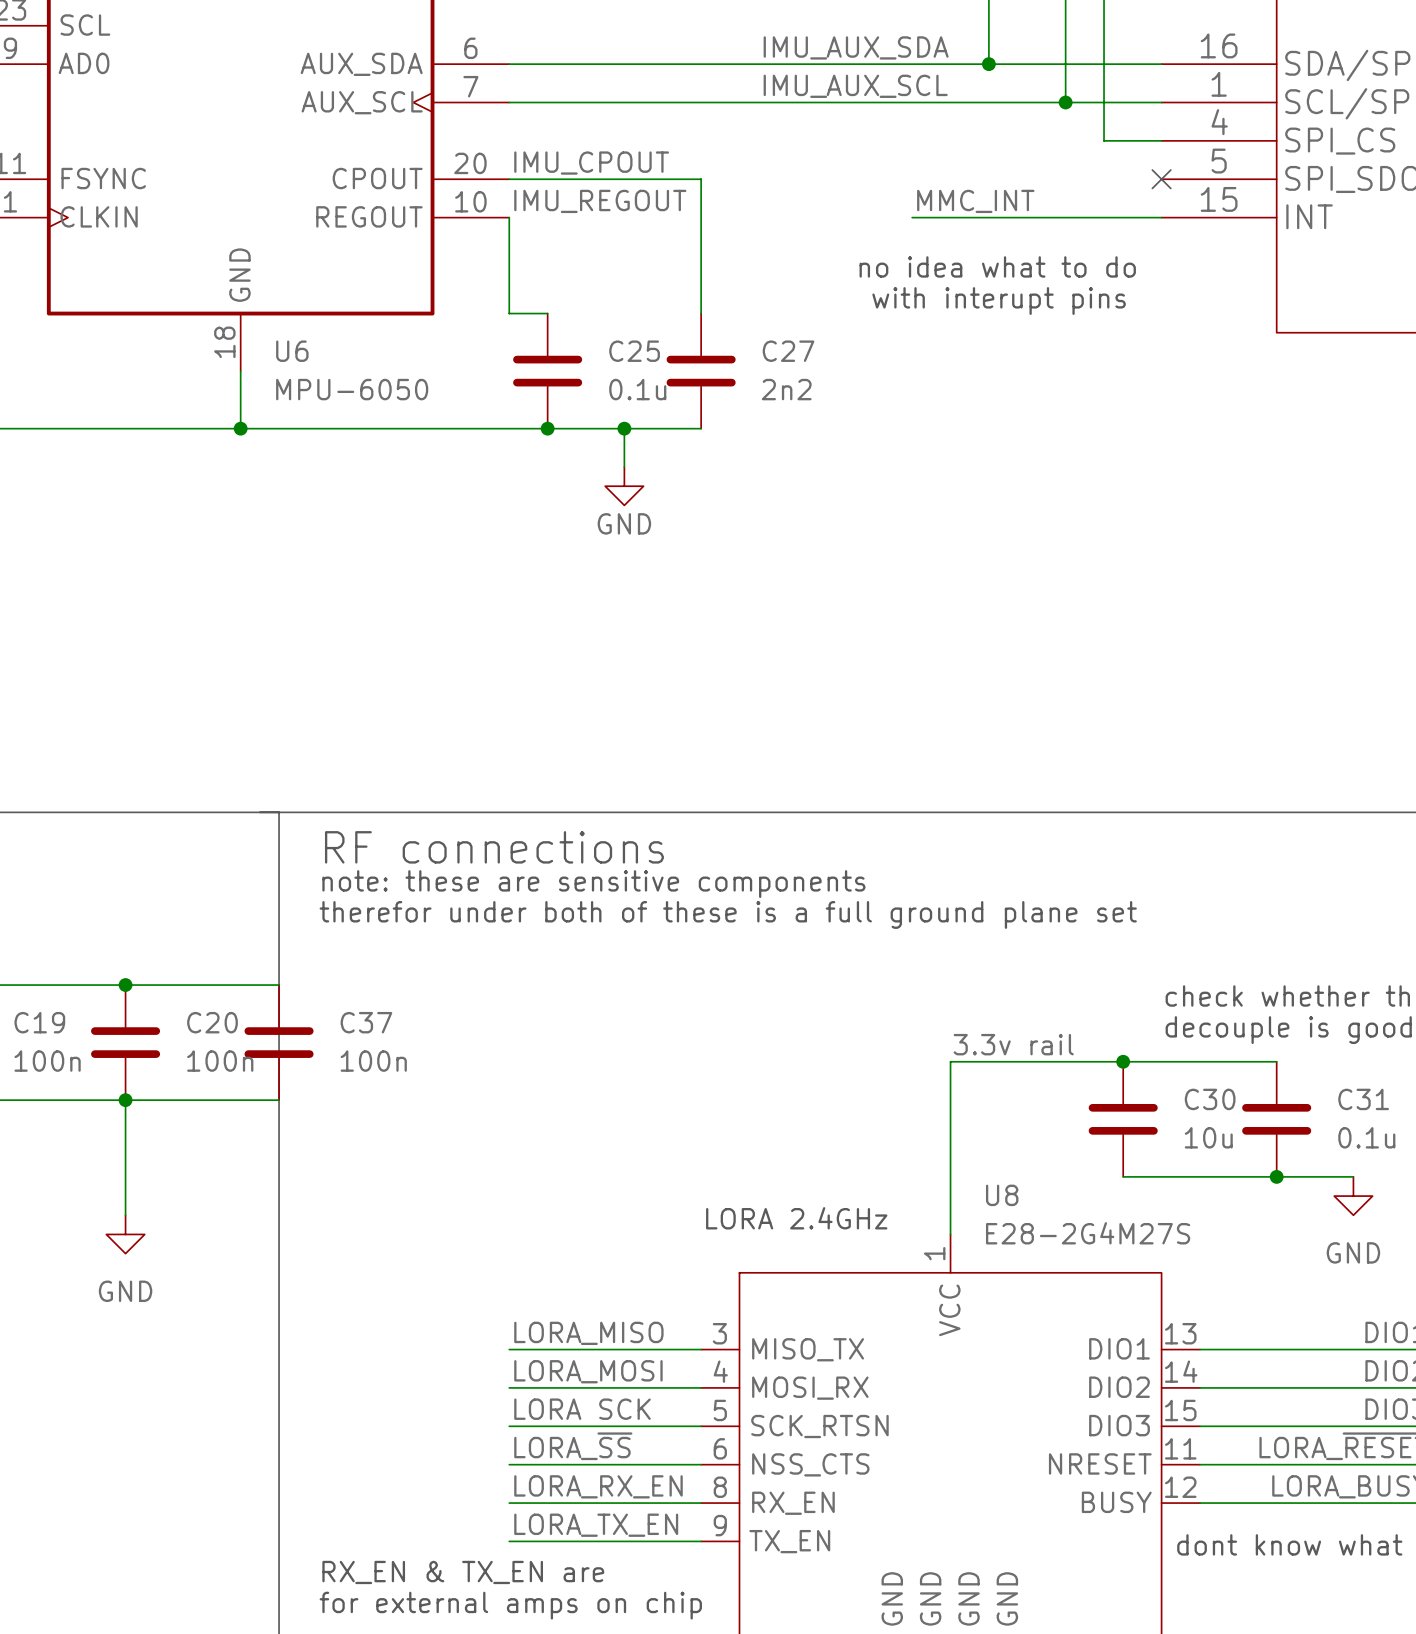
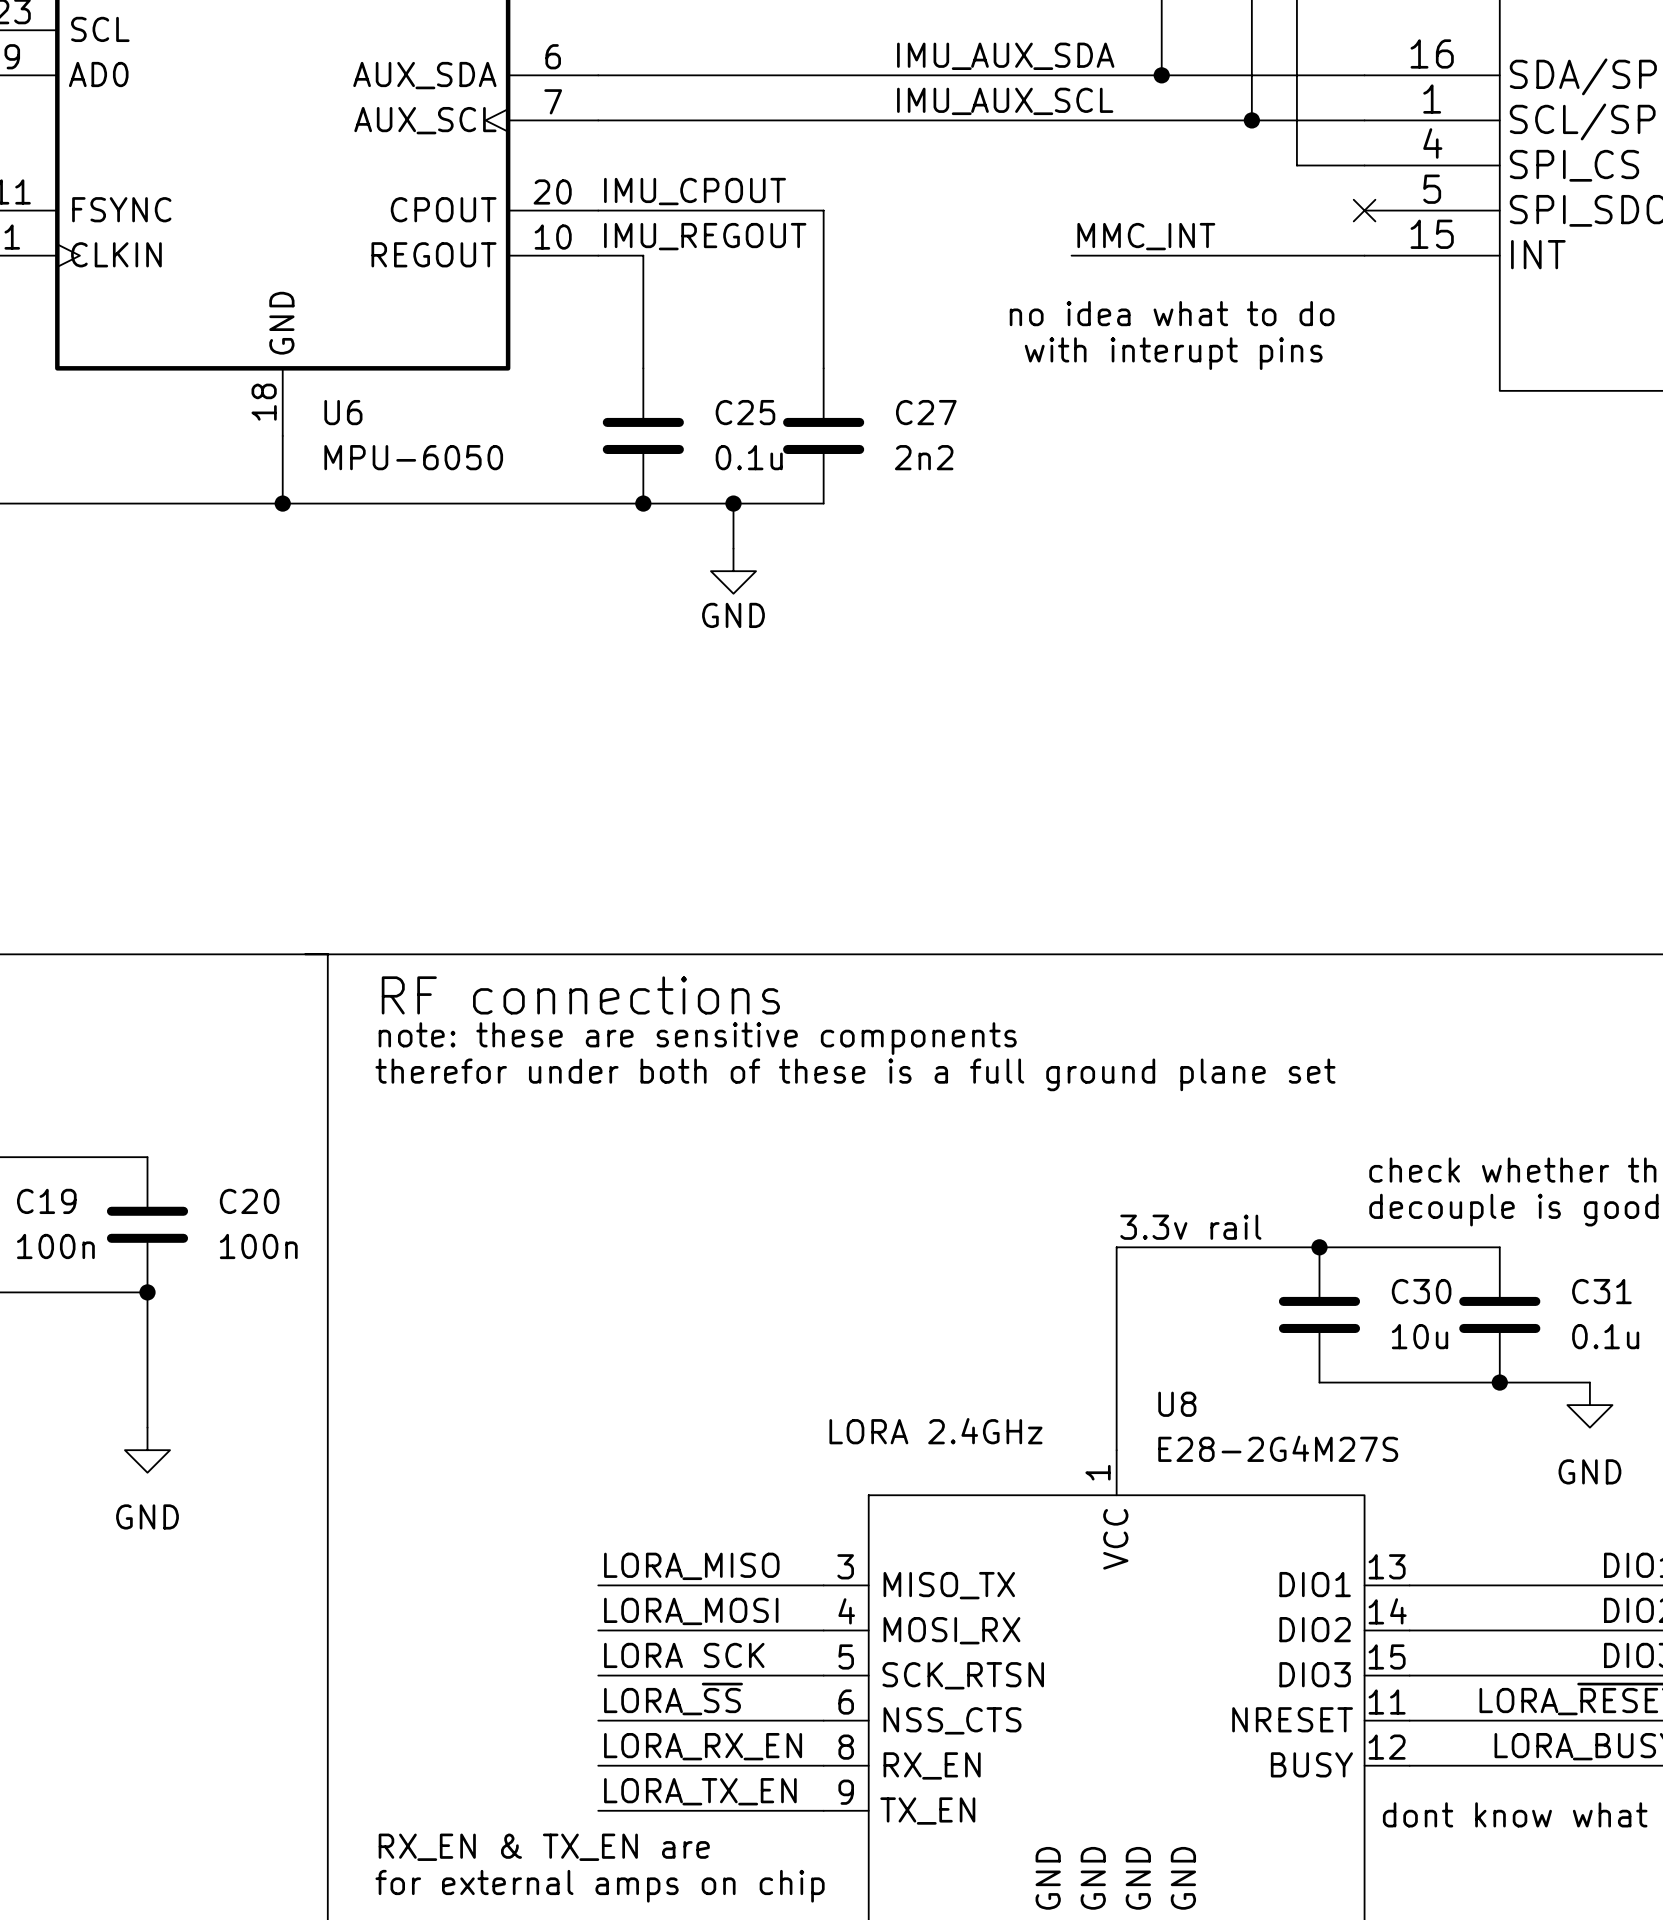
wire: (509, 217) (509, 313) (547, 313) -> (598, 255) (643, 255) (643, 368)
wire: (125, 985) (279, 985) -> none
junction: (125, 985) -> none
C37: 100n (279, 1042) -> none
wire: (125, 1100) (279, 1100) -> none

